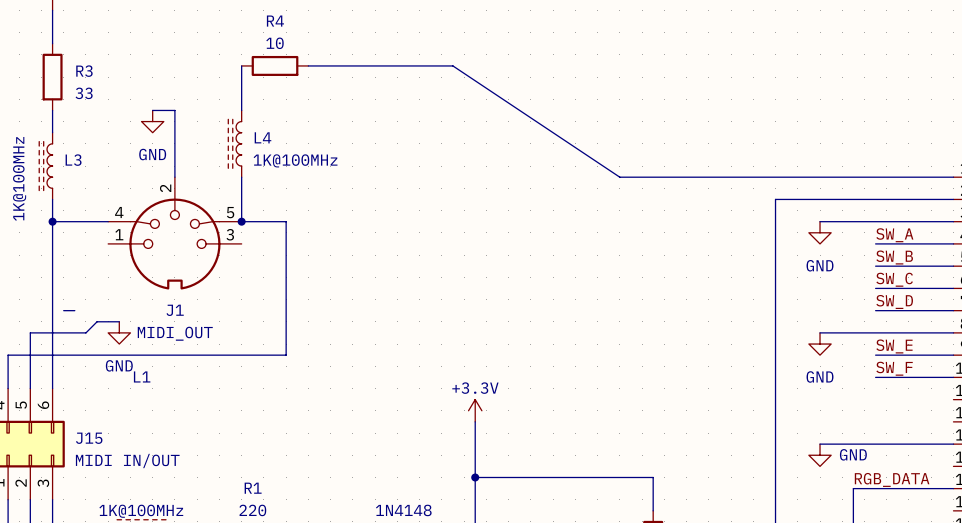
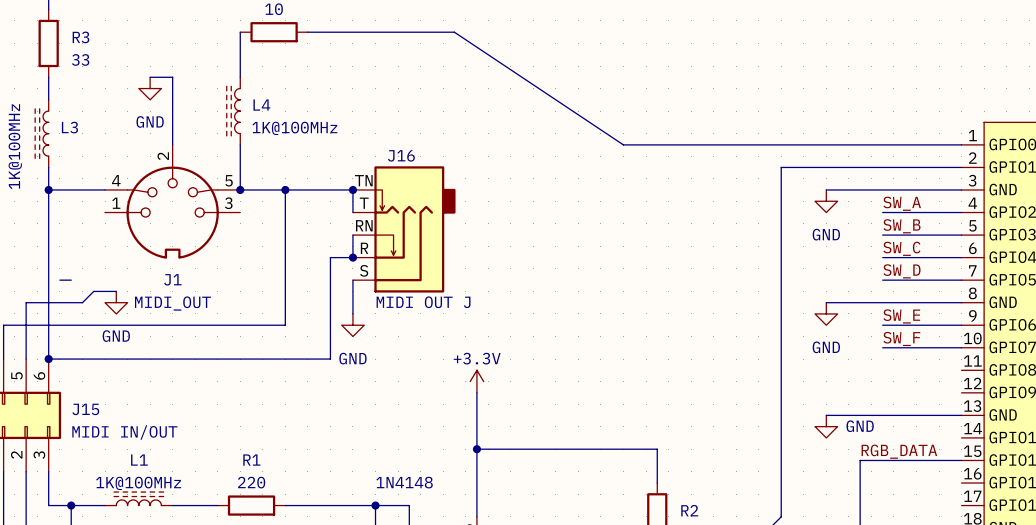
wire: none -> (285, 189) (352, 189) (352, 212)
junction: none -> (285, 189)
junction: none -> (352, 189)
J16: none -> MIDI OUT J (404, 229)
wire: none -> (352, 235) (352, 257) (330, 257) (330, 359) (48, 359)
junction: none -> (352, 257)
wire: none -> (352, 280) (352, 313)
power symbol: none -> GND (352, 325)
L1 name position: L1 (142, 376) -> L1 (139, 460)
junction: none -> (48, 359)

